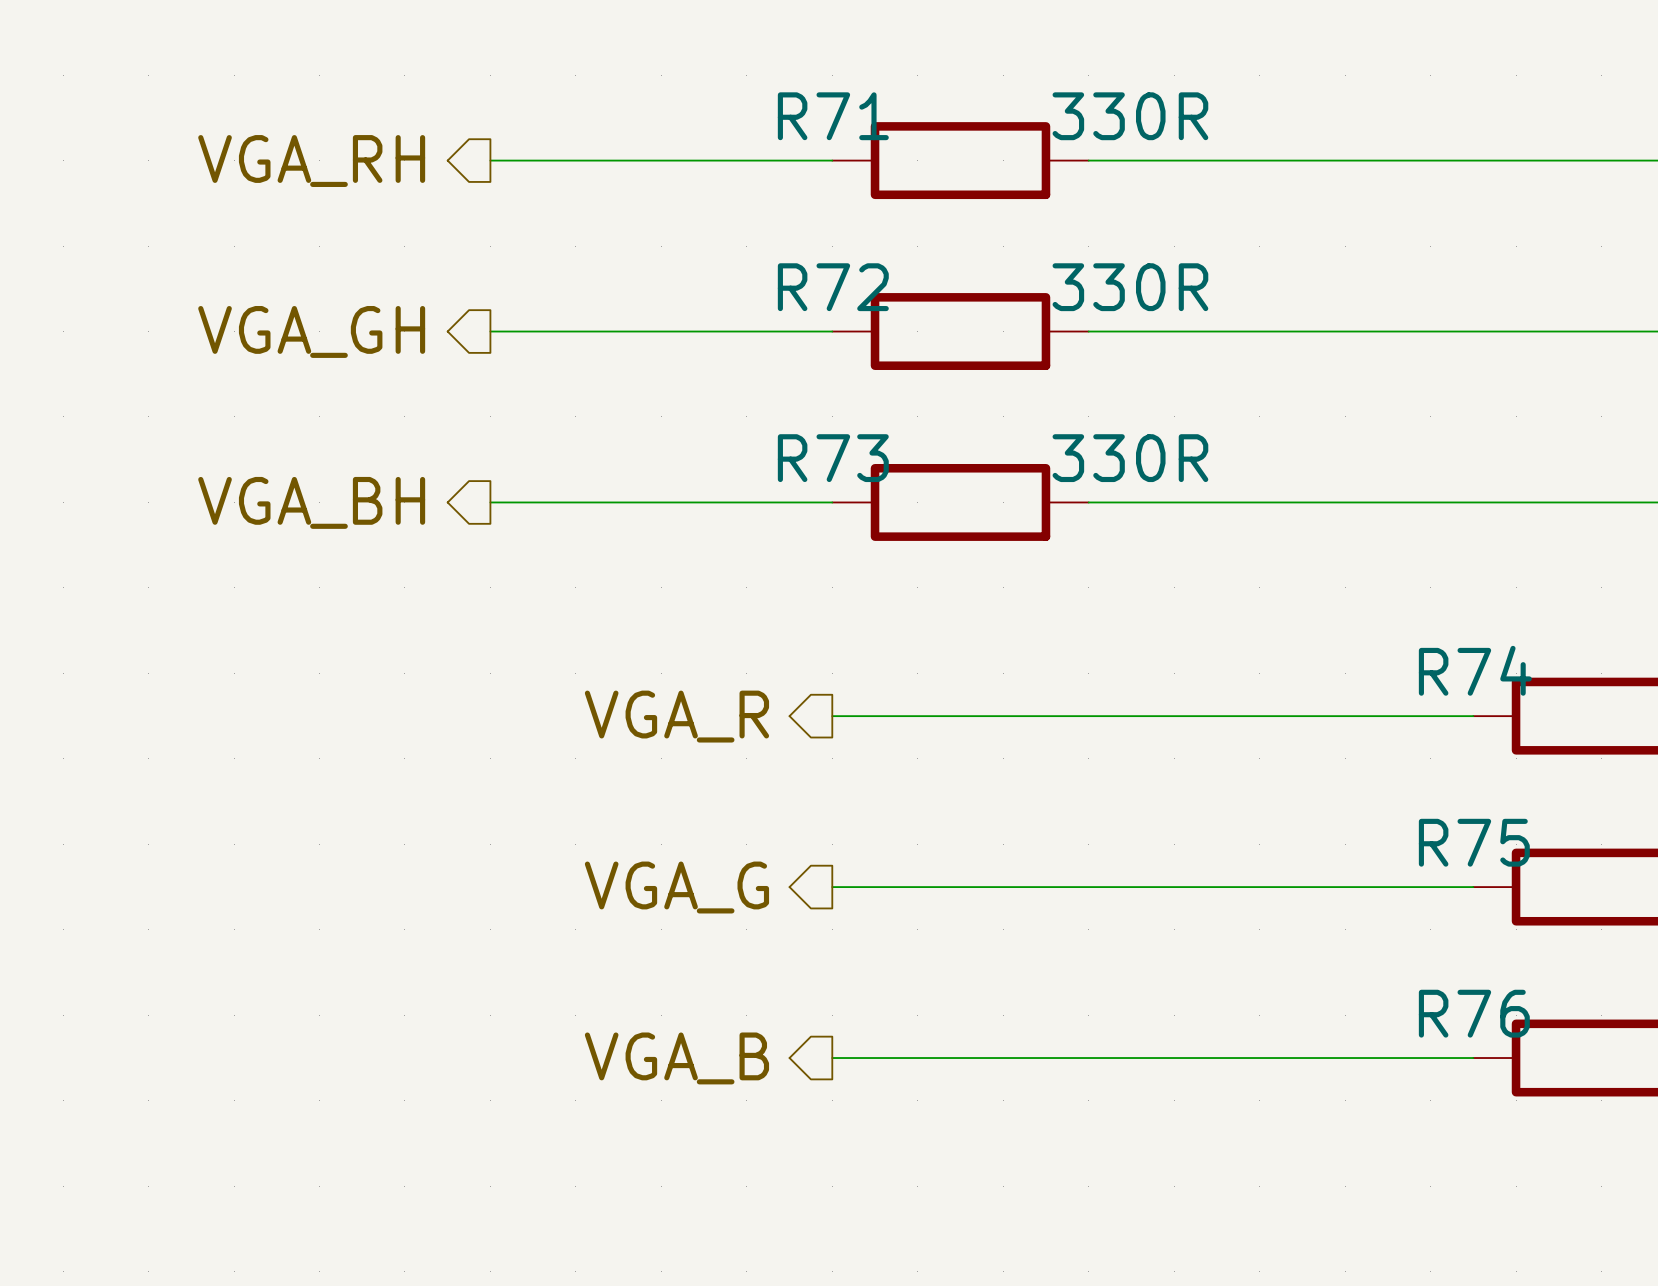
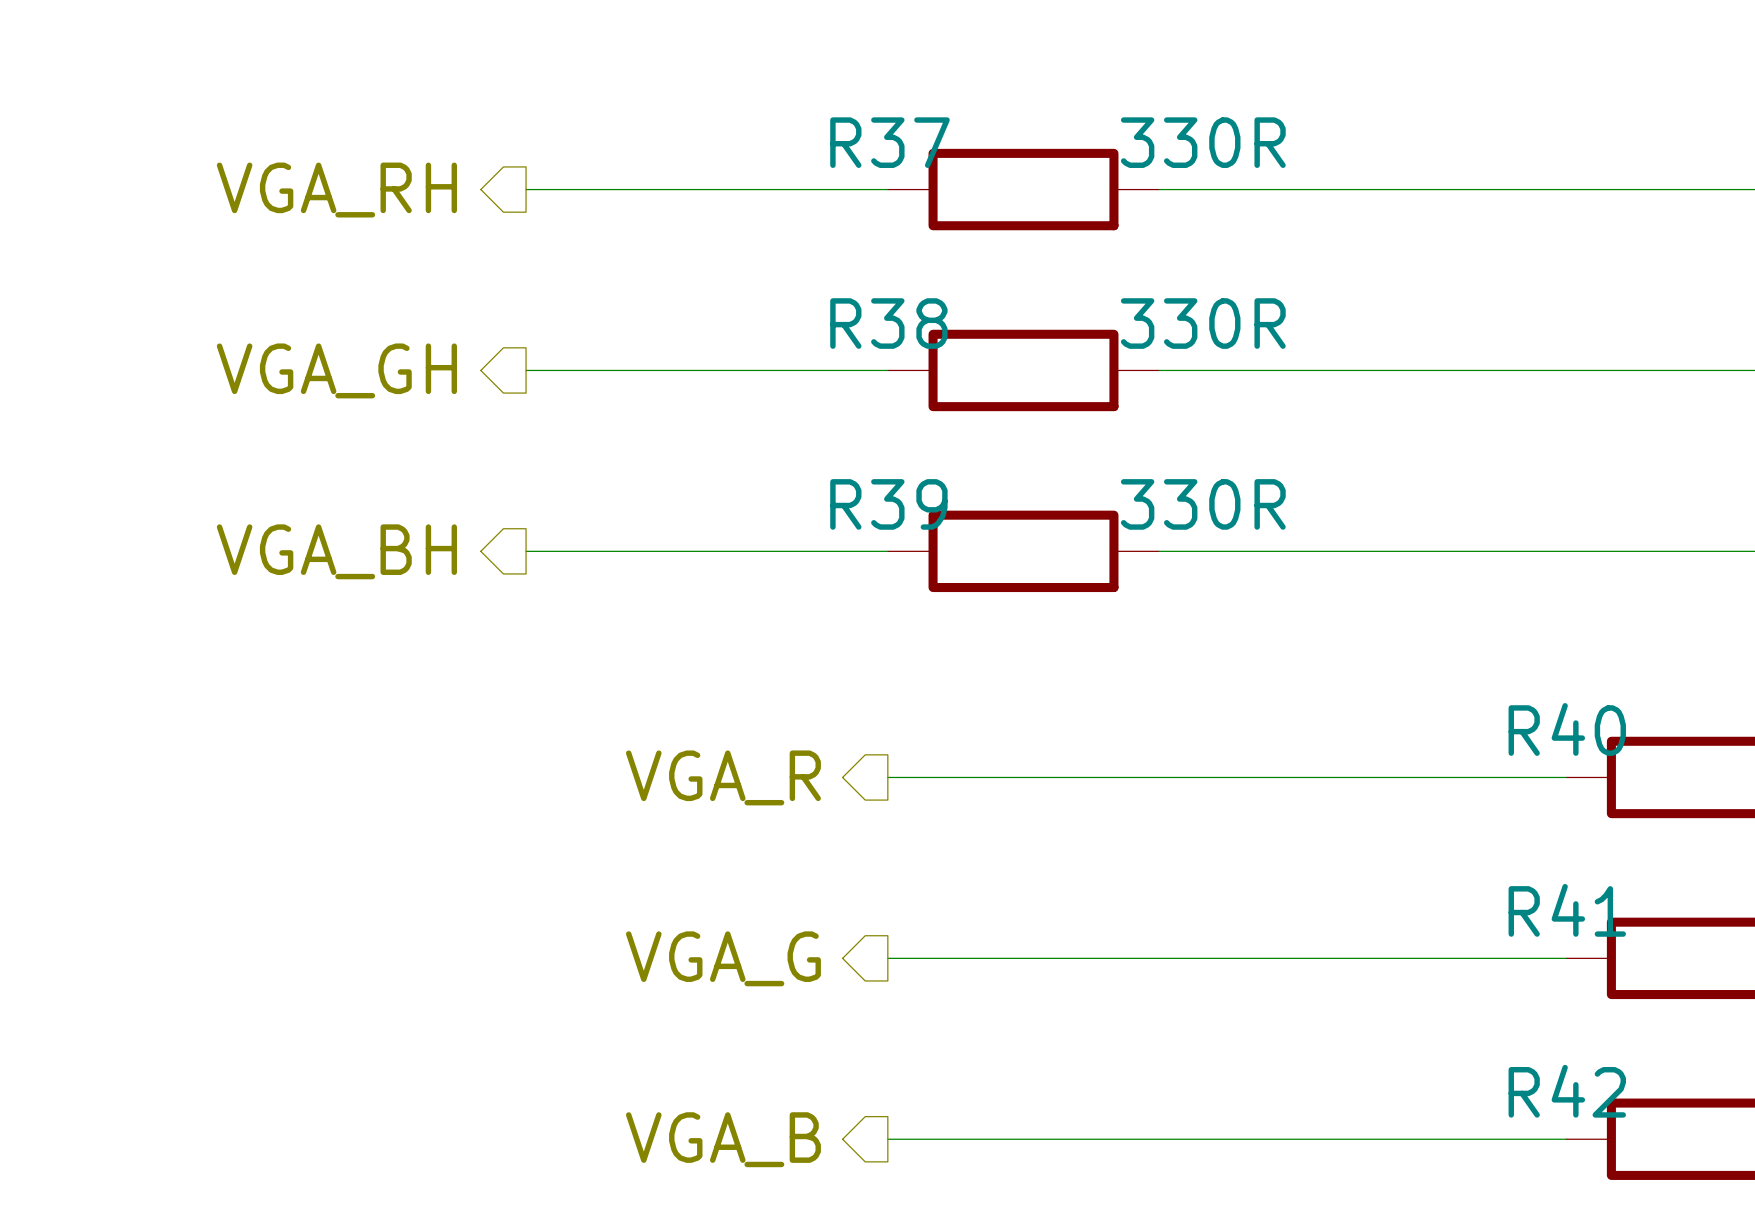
R71 name: R71 (833, 116) -> R37 (889, 142)
R72 name: R72 (833, 287) -> R38 (888, 323)
R73 name: R73 (833, 458) -> R39 (888, 504)
R74 name: R74 (1475, 670) -> R40 (1567, 729)
R75 name: R75 (1474, 842) -> R41 (1567, 910)
R76 name: R76 (1474, 1013) -> R42 (1567, 1091)

